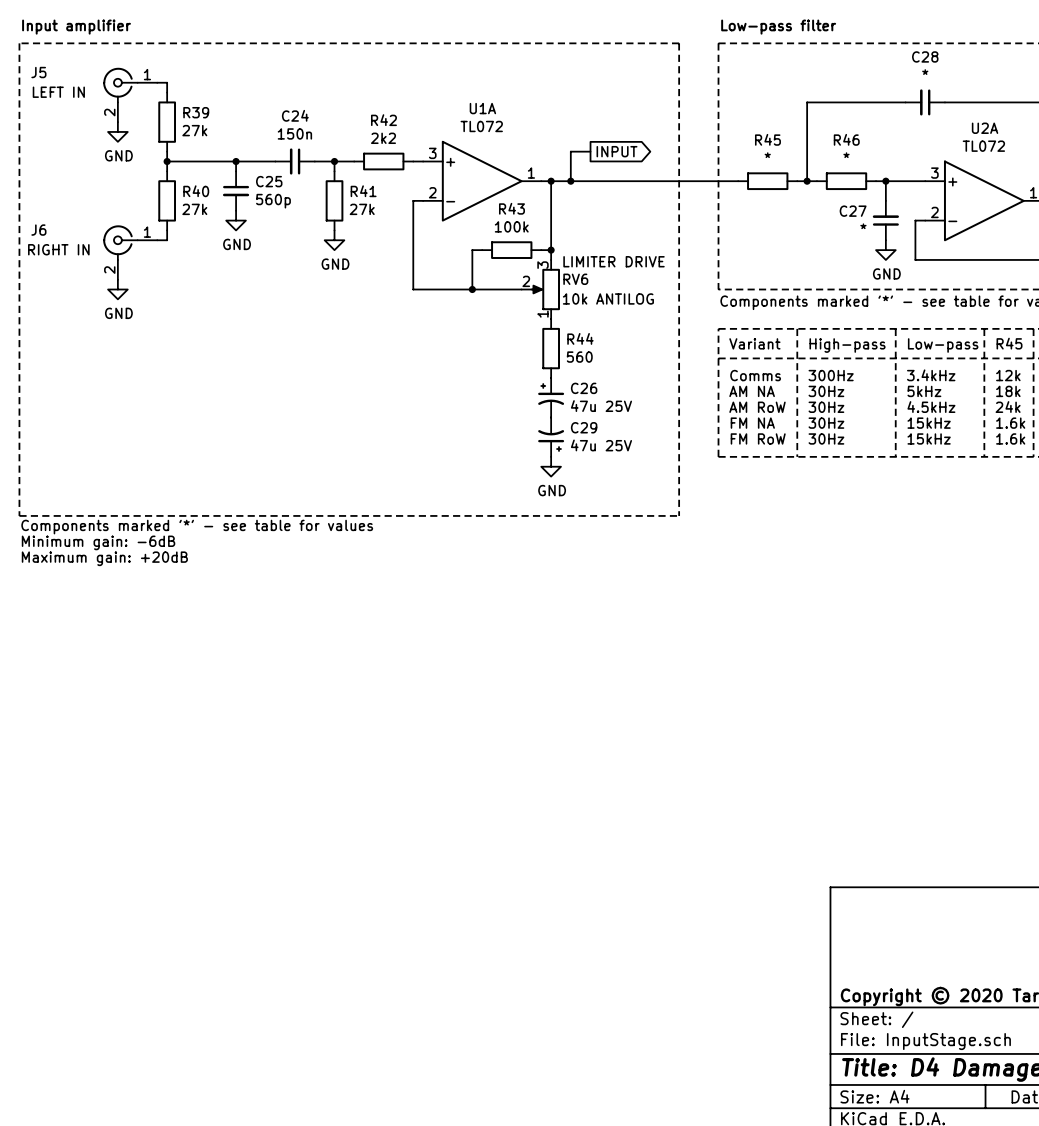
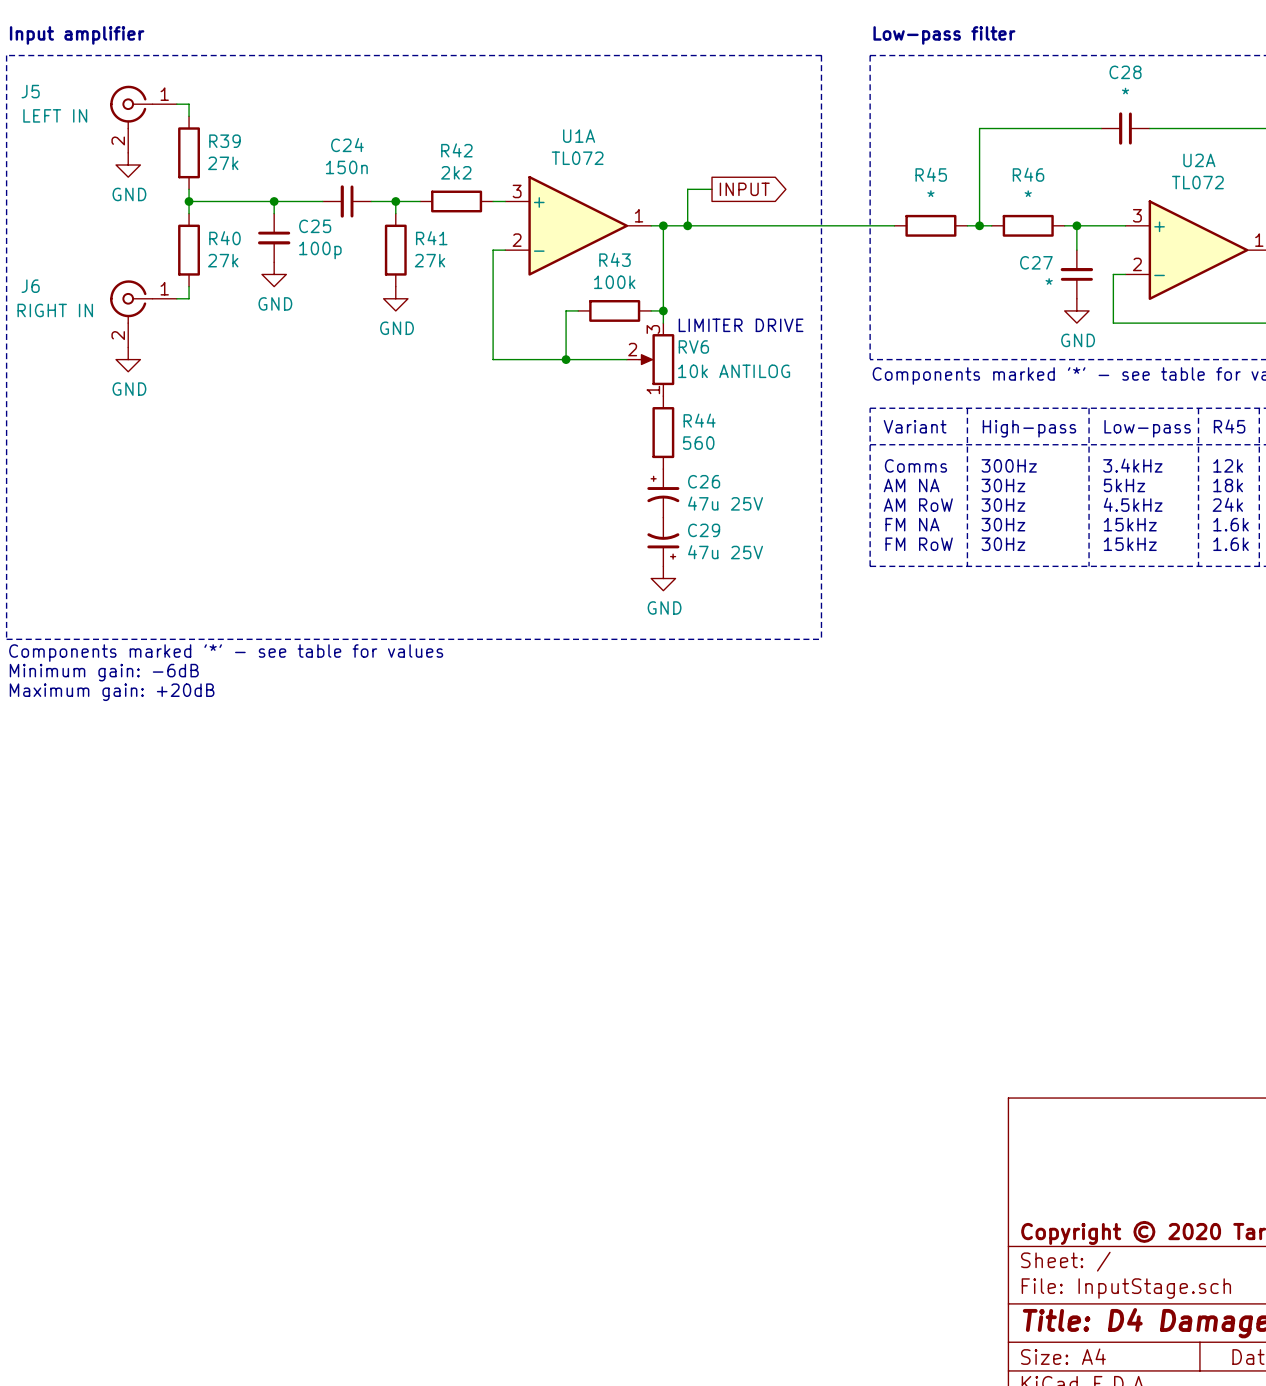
C25 value: 560p (273, 201) -> 100p (320, 250)

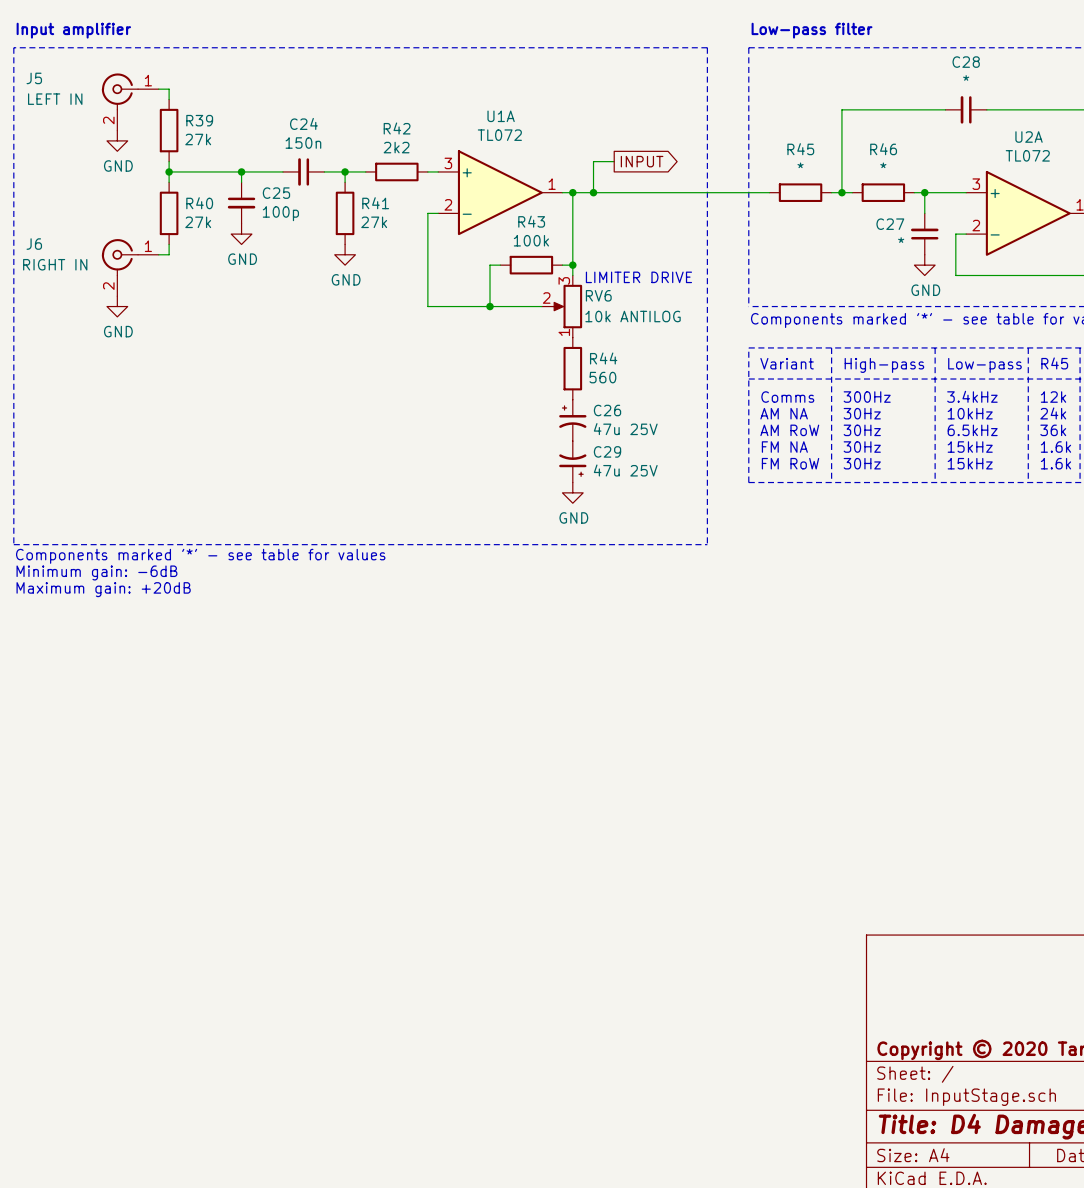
text: 5kHz (1124, 485) -> 10kHz (970, 413)
text: 18k (1228, 485) -> 24k (1053, 413)
text: 4.5kHz (1133, 504) -> 6.5kHz (972, 430)
text: 24k (1227, 504) -> 36k (1053, 430)

